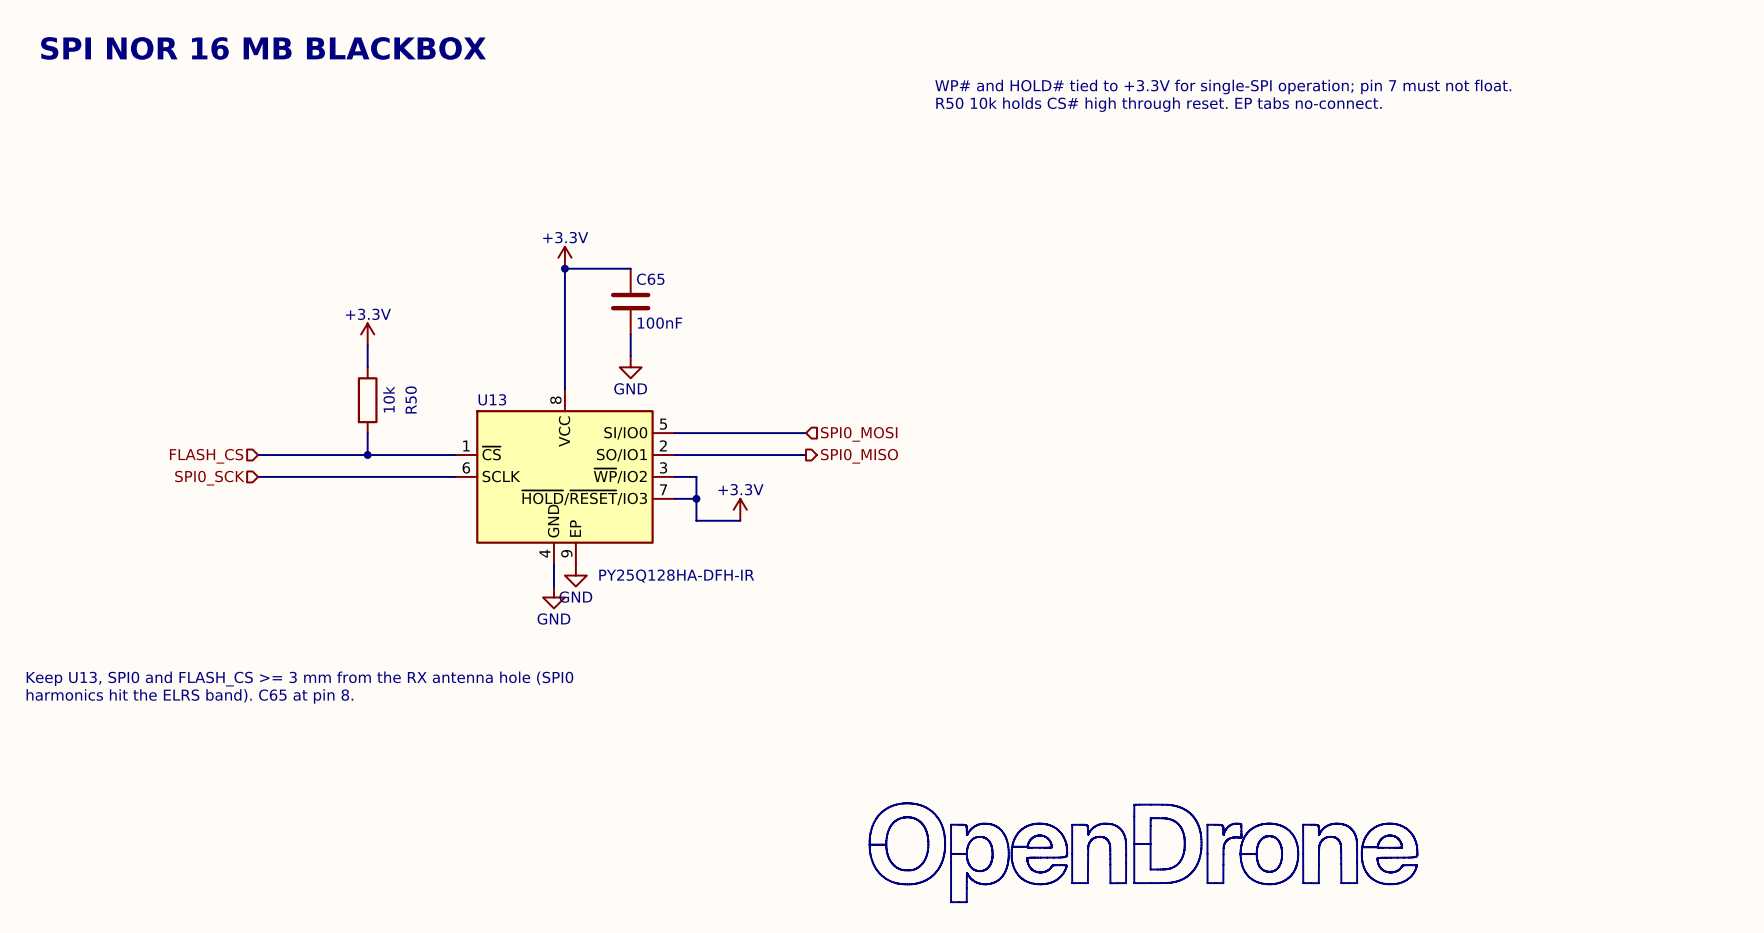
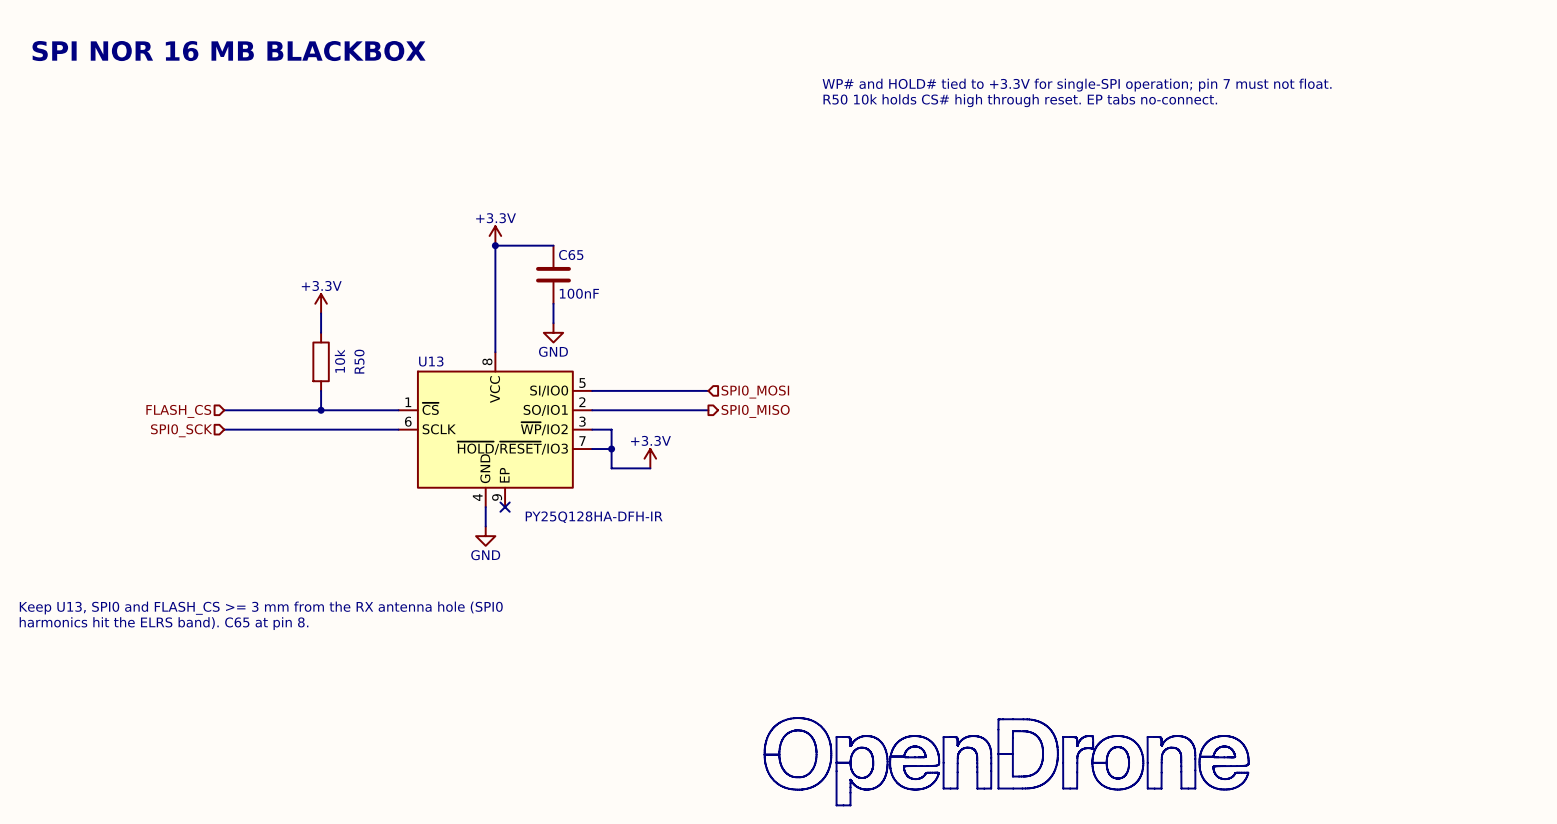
no-connect mark: none -> (505, 507)
power symbol: GND (575, 575) -> none

